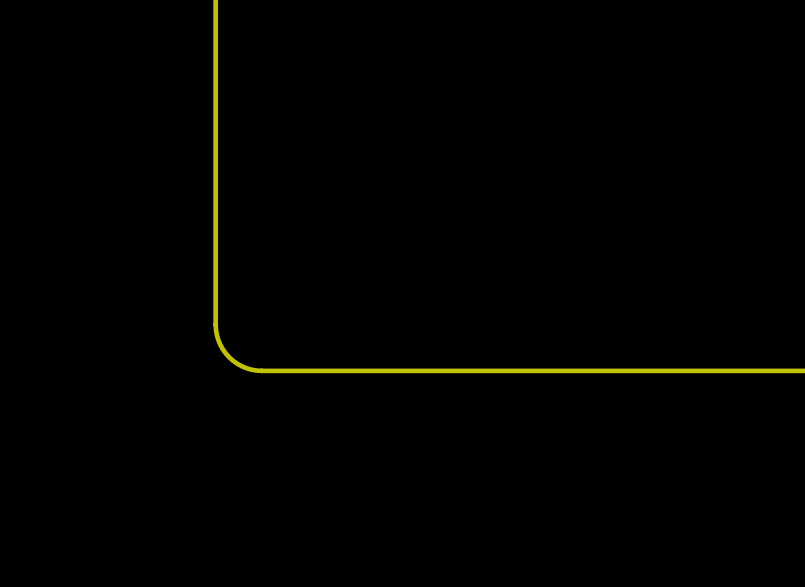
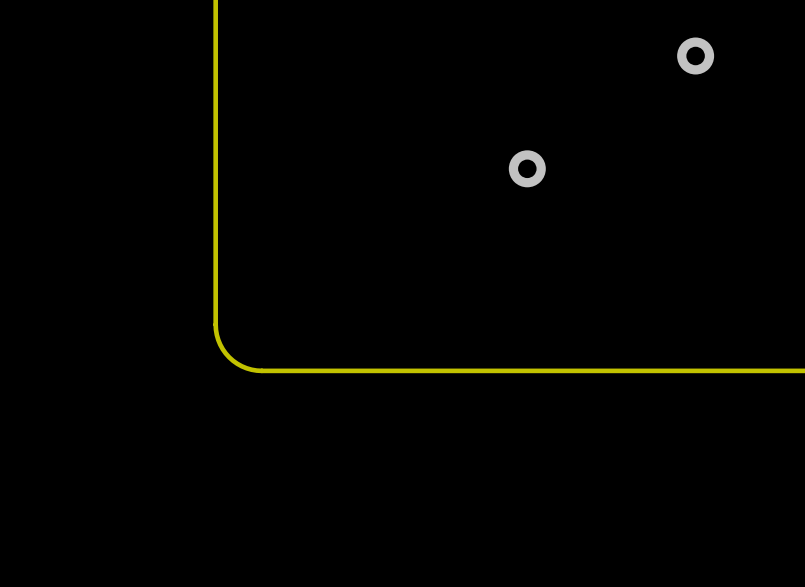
via: none -> (695, 56)
via: none -> (527, 168)

